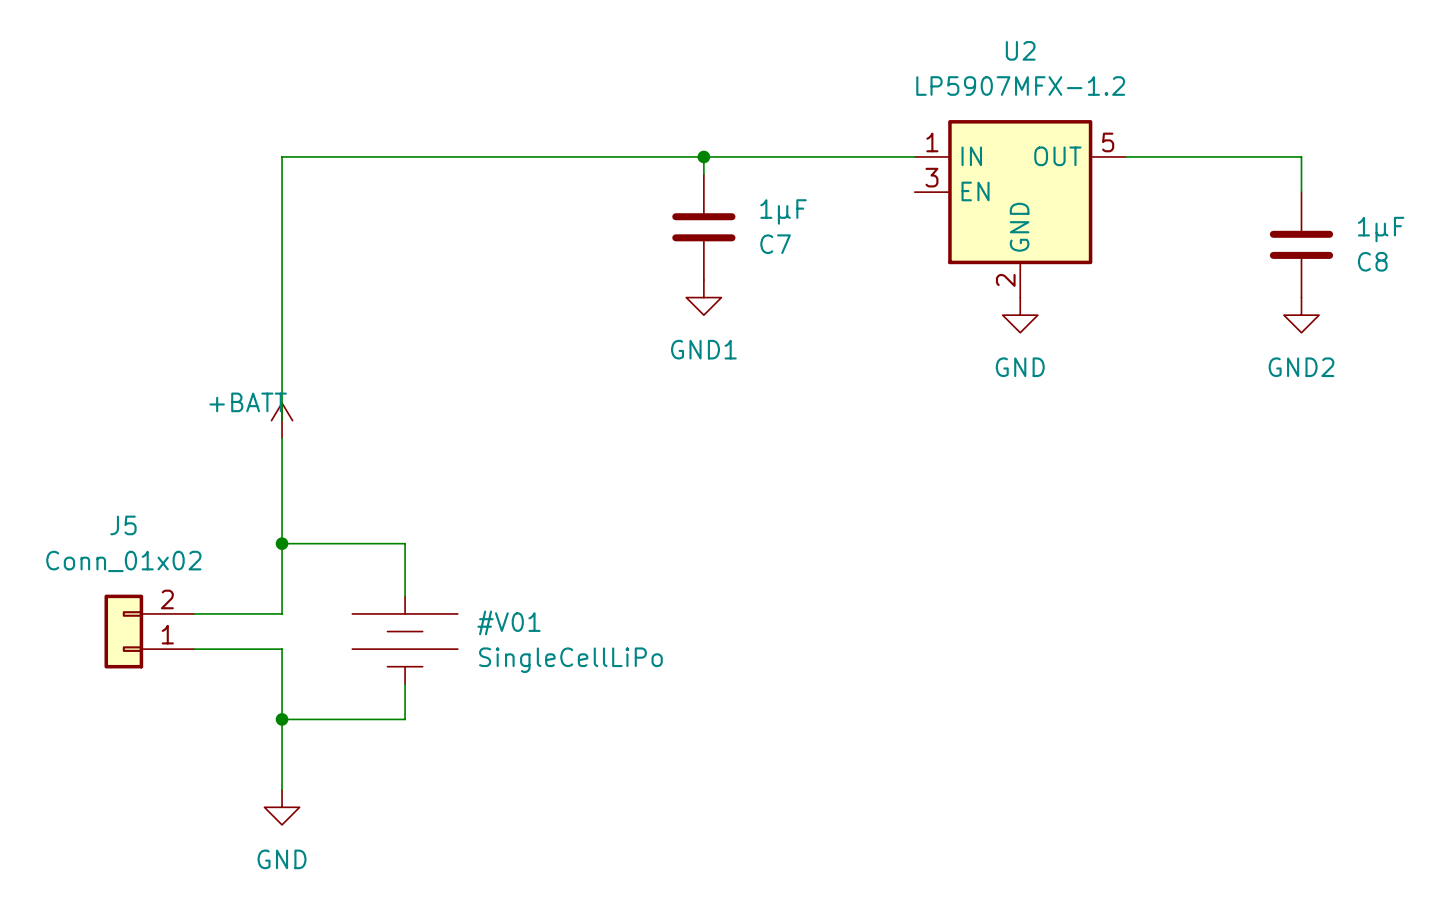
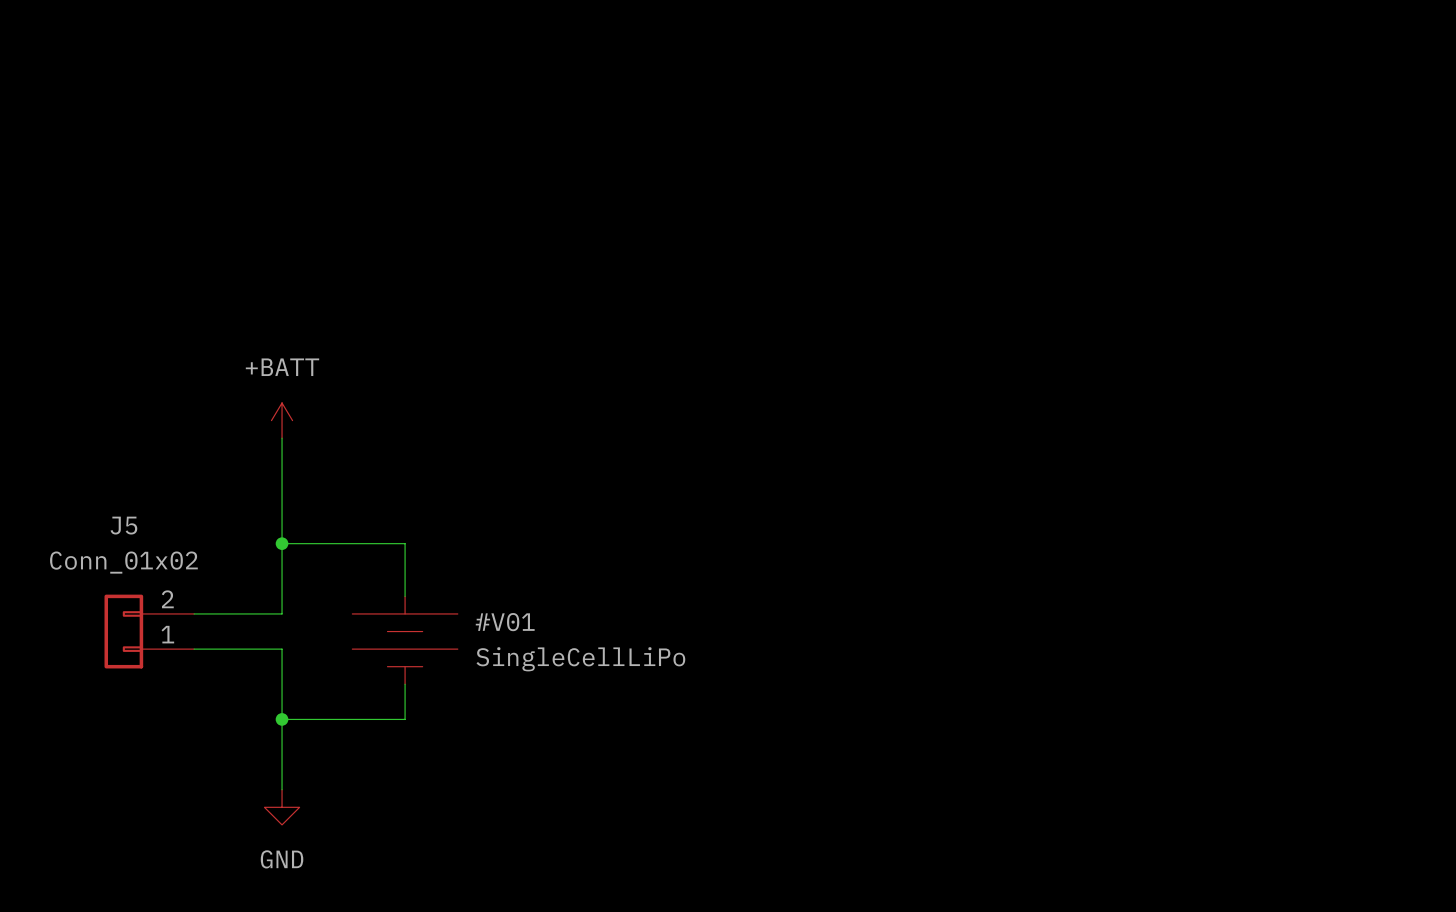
wire: (703, 156) (703, 174) -> none
junction: (703, 156) -> none
wire: (914, 156) (282, 156) (282, 420) -> none
wire: (1125, 156) (1301, 156) (1301, 192) -> none
U2: LP5907MFX-1.2 (1020, 208) -> none
C7: 1µF (703, 227) -> none
C8: 1µF (1301, 244) -> none
power symbol: GND1 (703, 297) -> none
power symbol: GND (1020, 315) -> none
power symbol: GND2 (1301, 315) -> none
power symbol text position: +BATT (248, 402) -> +BATT (282, 367)

